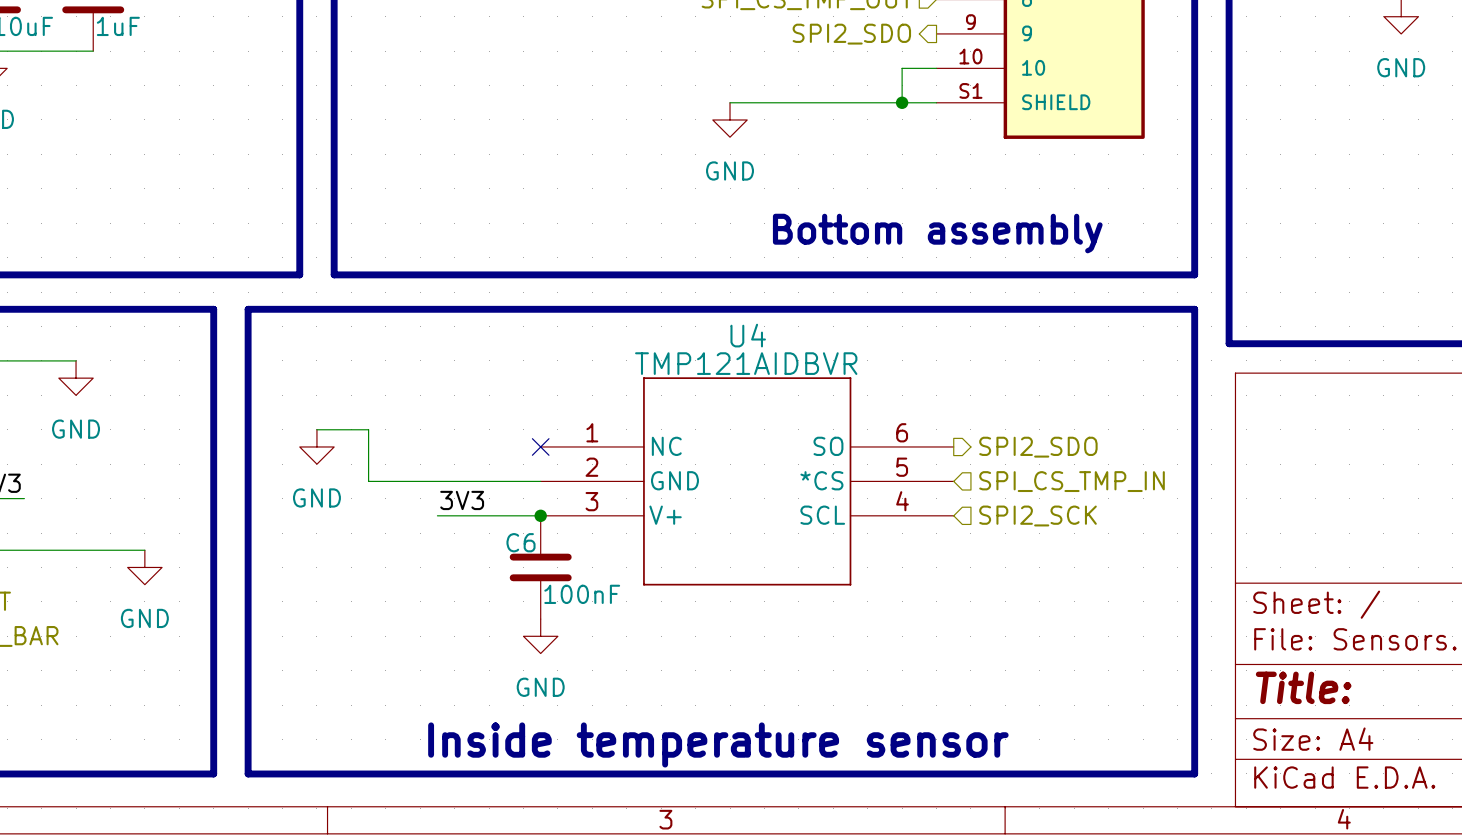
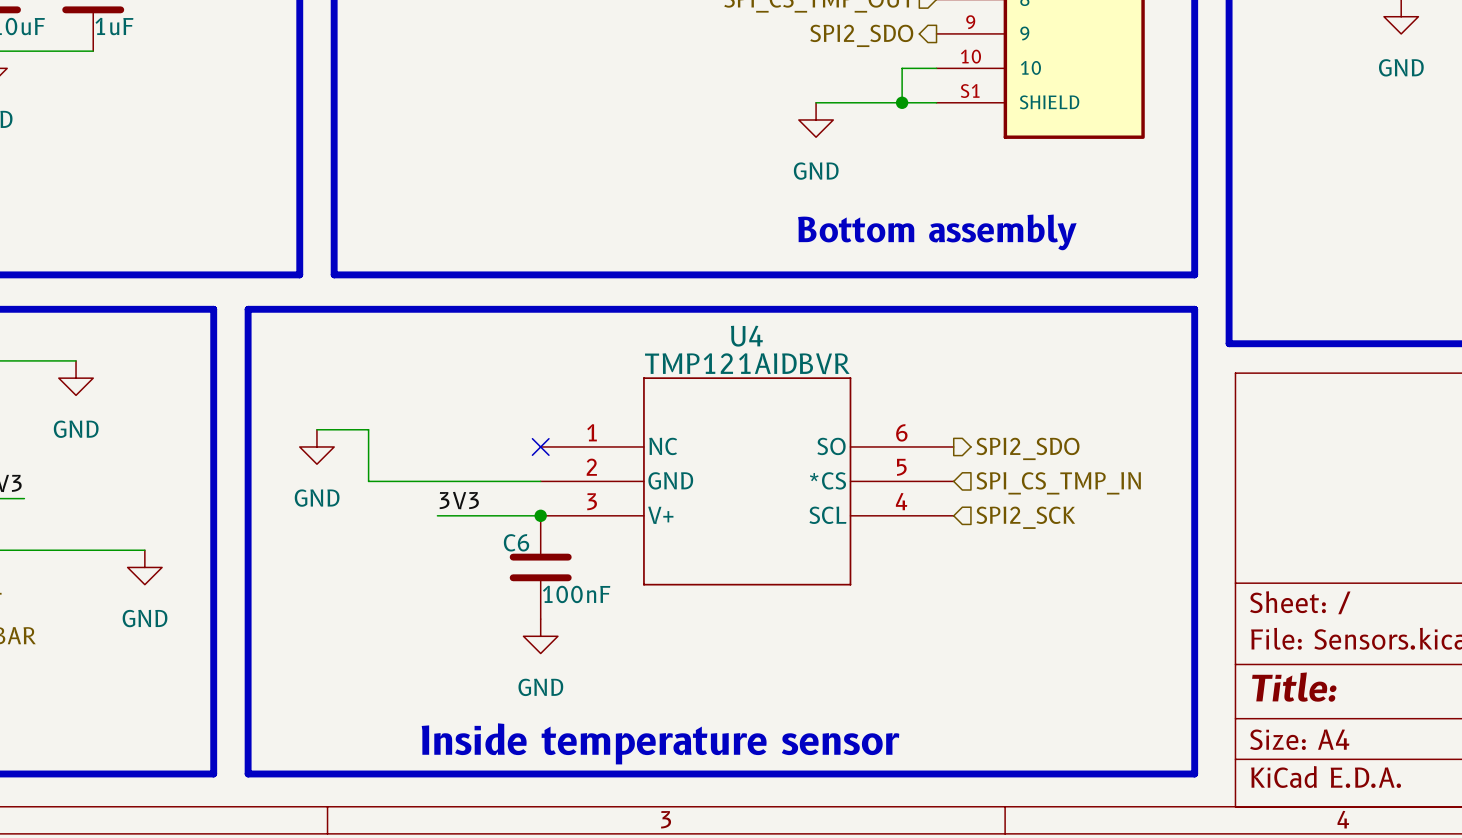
wire: (730, 102) (816, 102) -> none
power symbol position: GND (730, 119) -> GND (816, 119)

